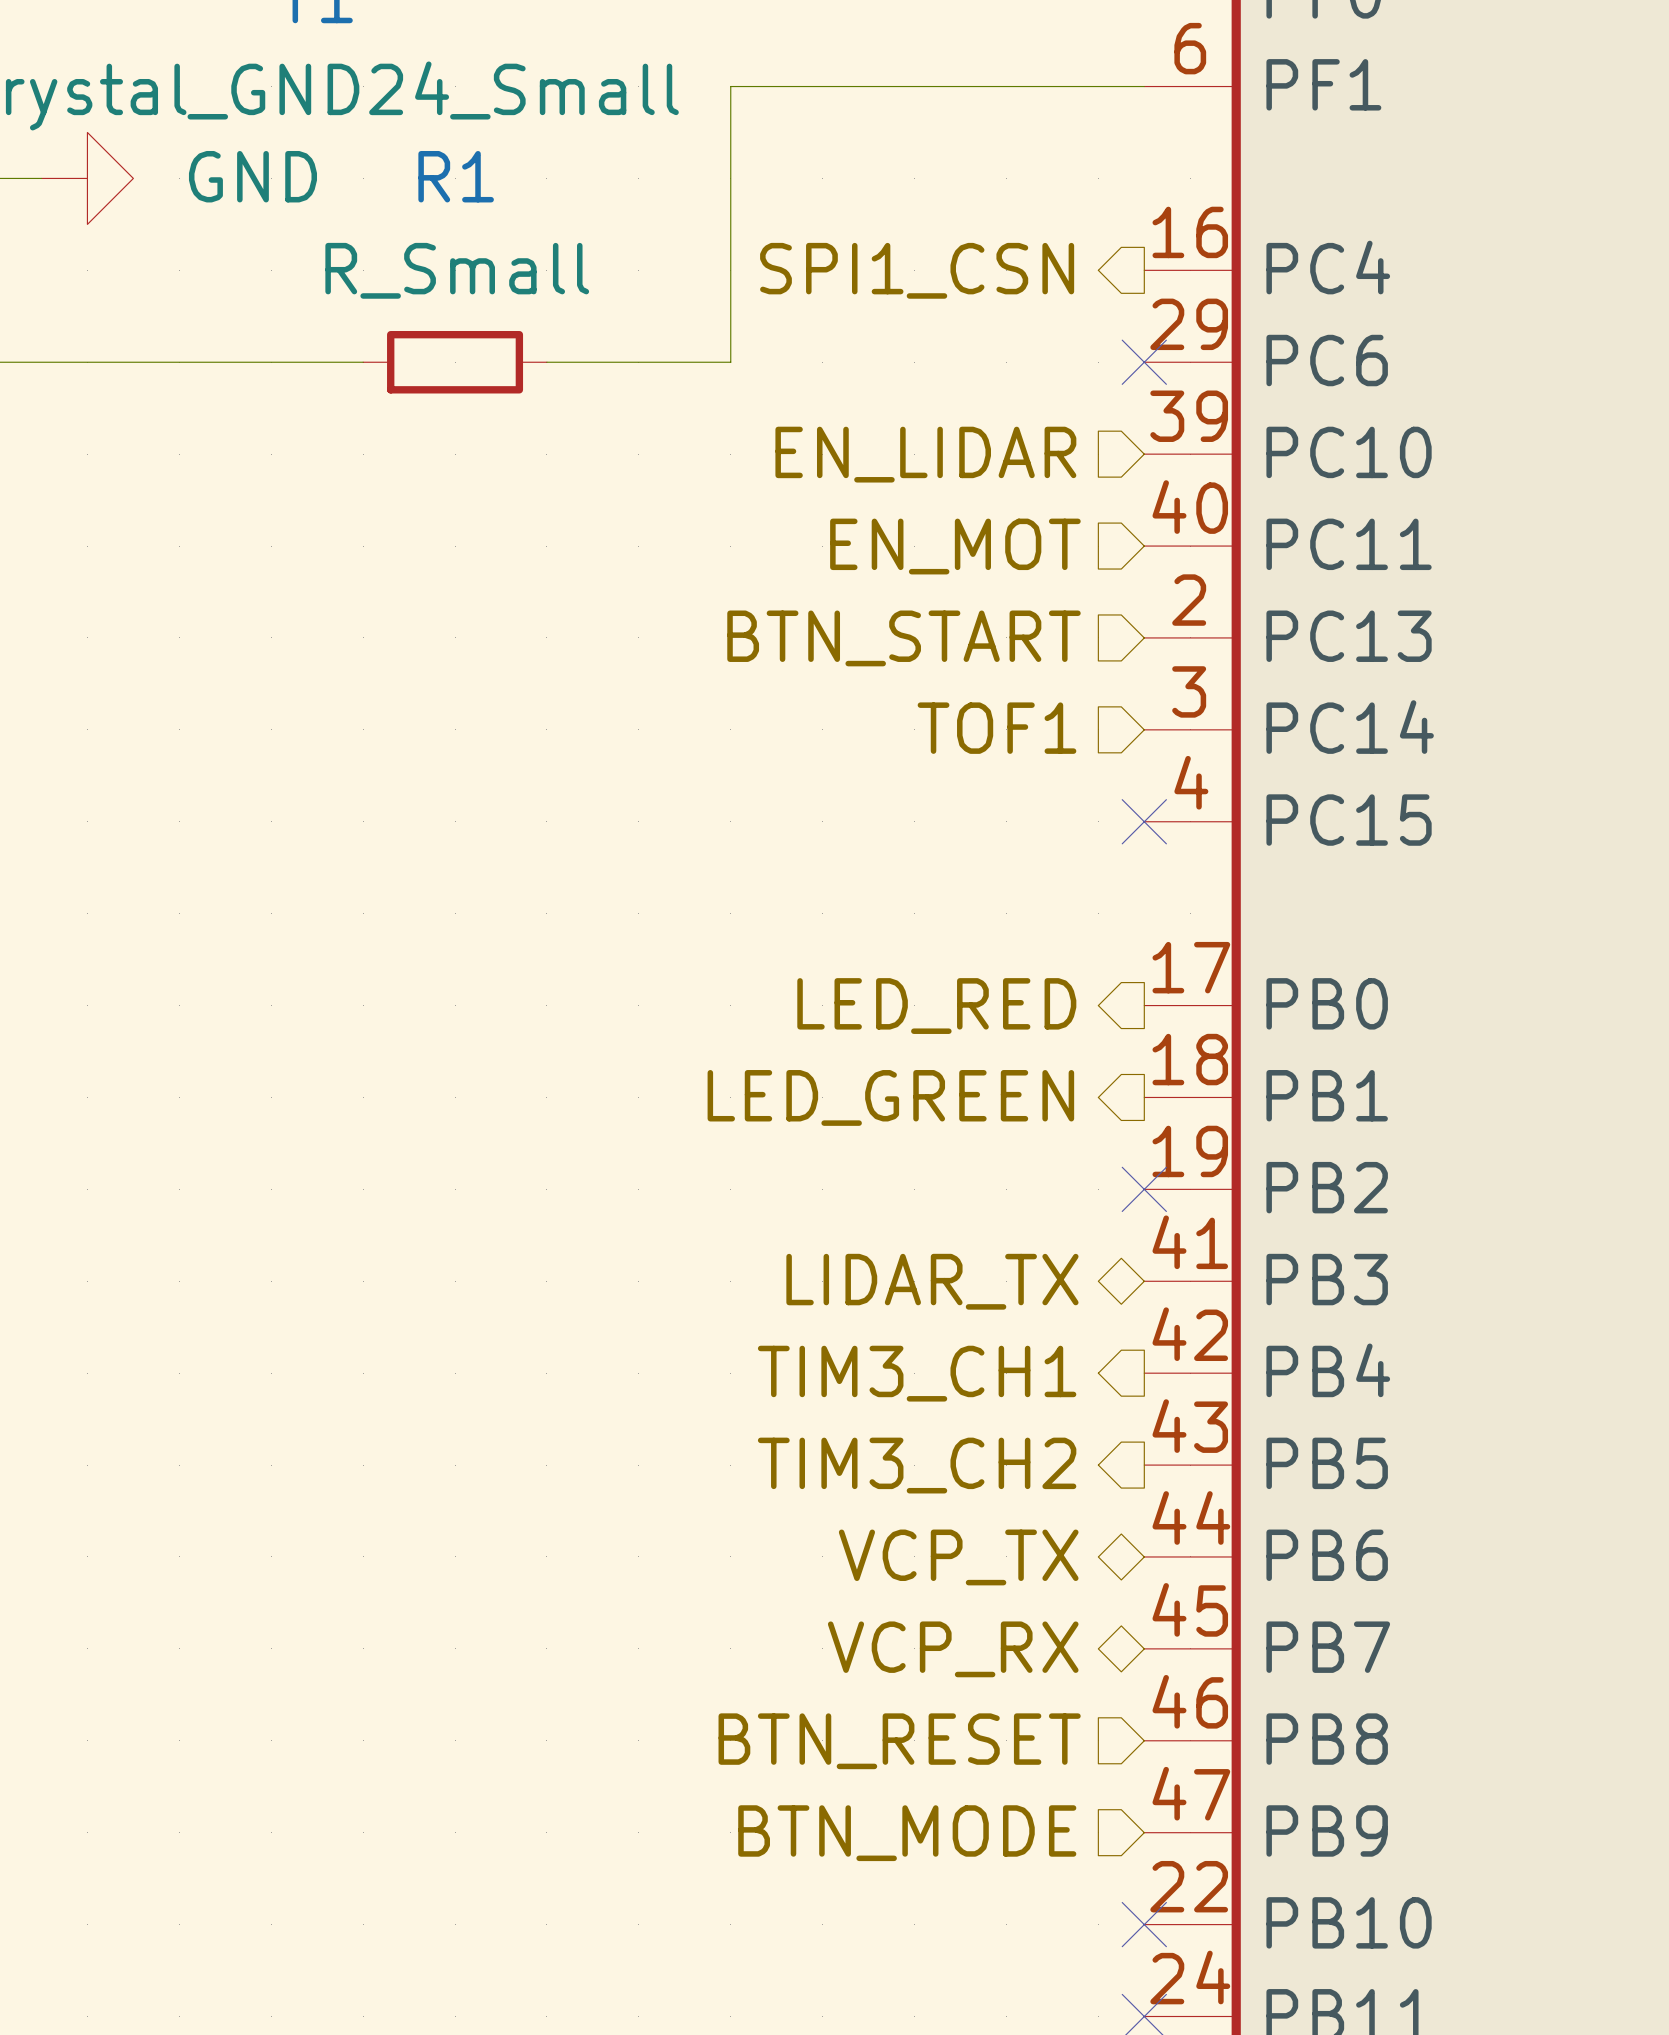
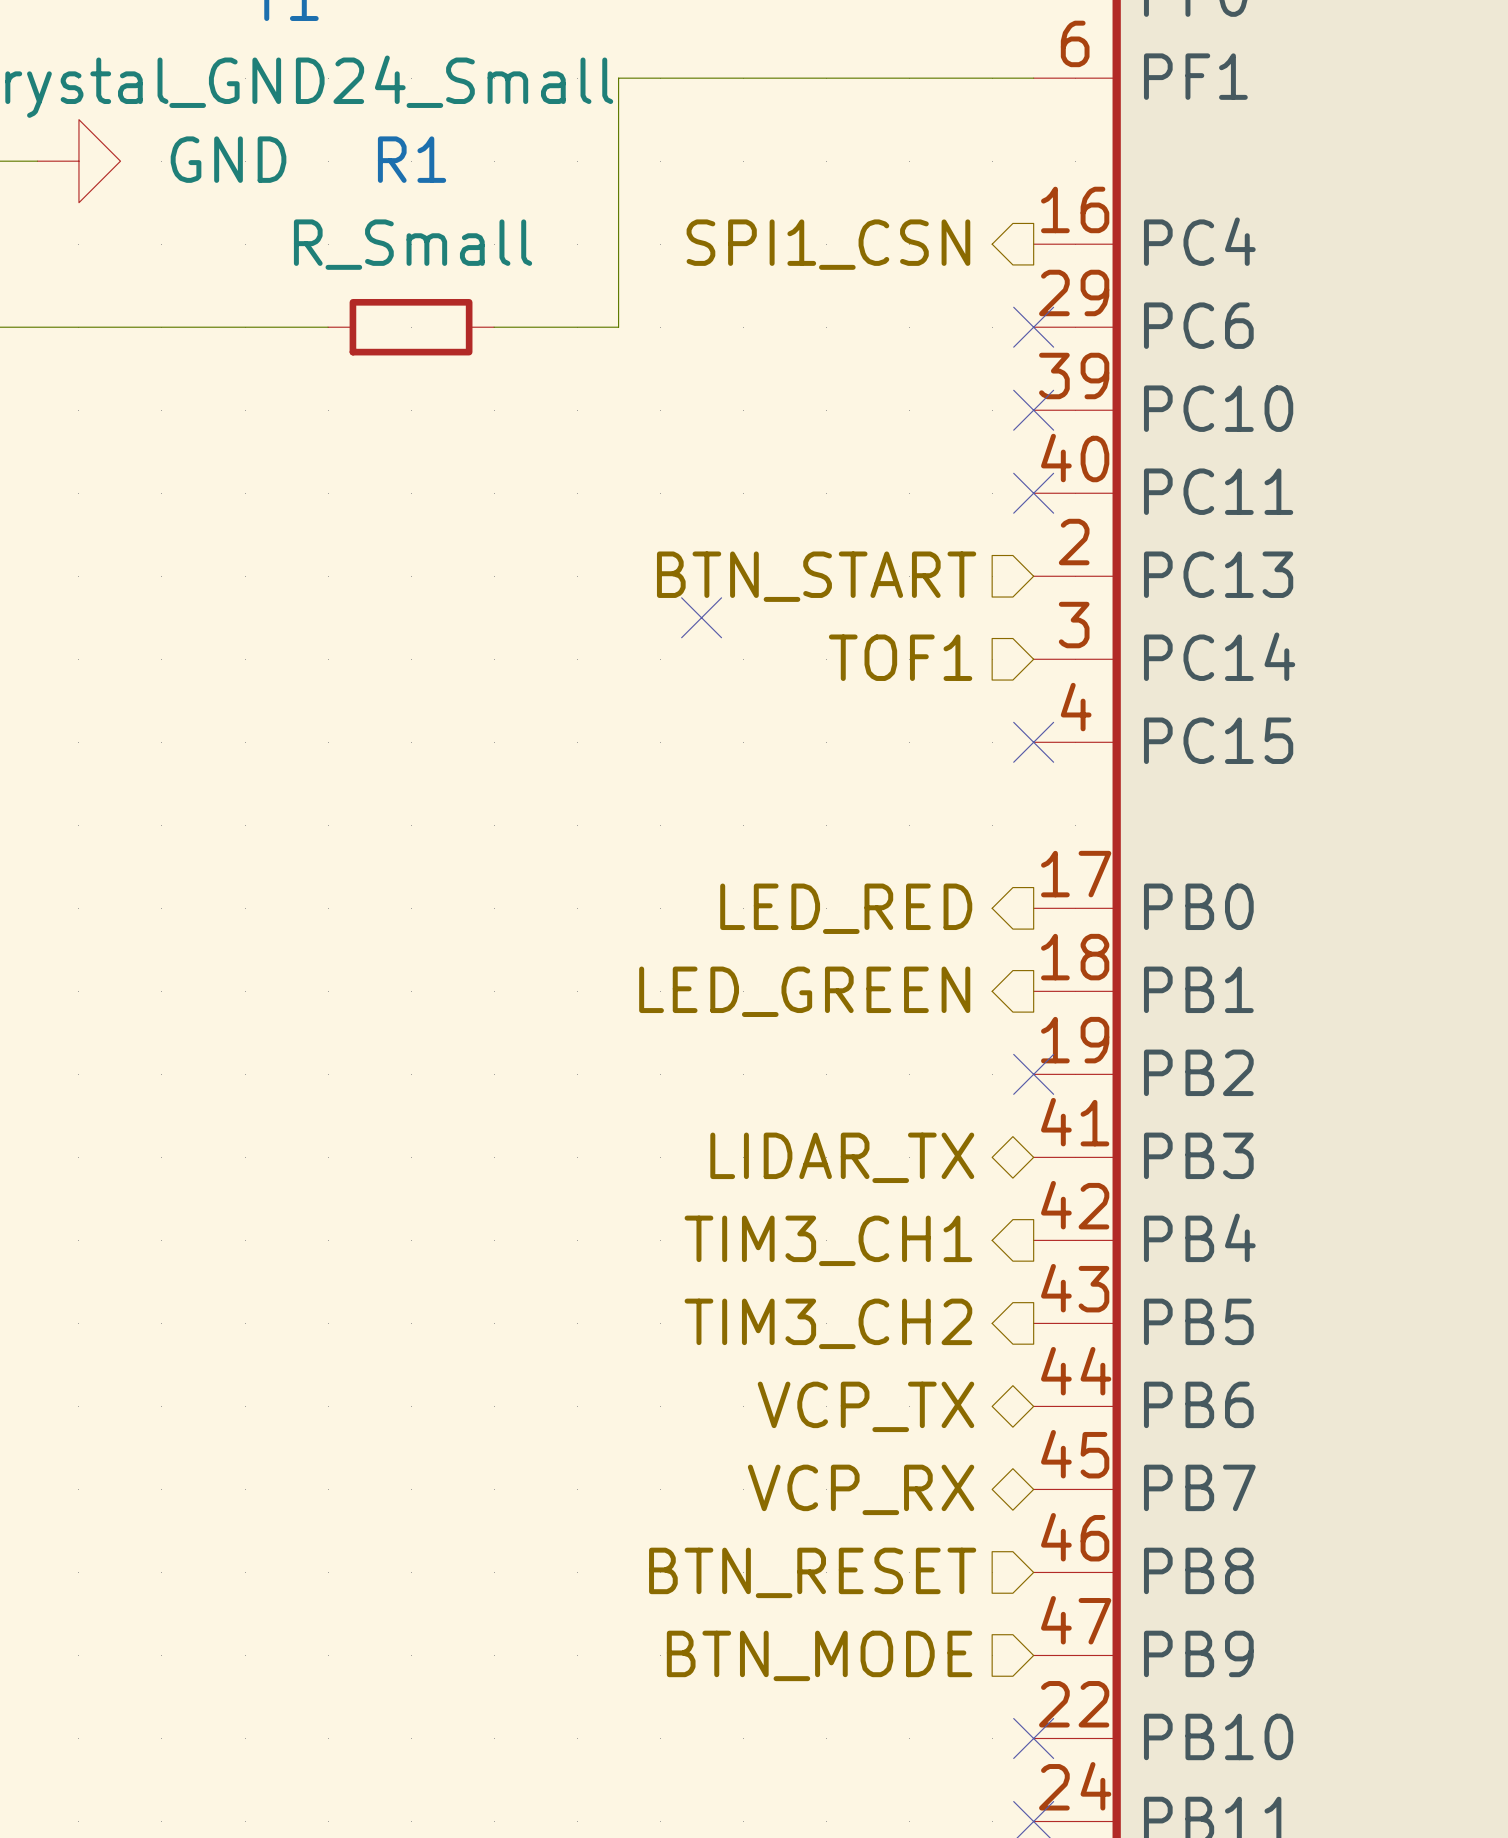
wire: (730, 86) (730, 362) (684, 362) -> (660, 78) (618, 78) (618, 327)
hierarchical label: EN_LIDAR (925, 454) -> none
no-connect mark: none -> (1033, 410)
hierarchical label: EN_MOT (955, 546) -> none
no-connect mark: none -> (1033, 493)
no-connect mark: none -> (701, 617)

